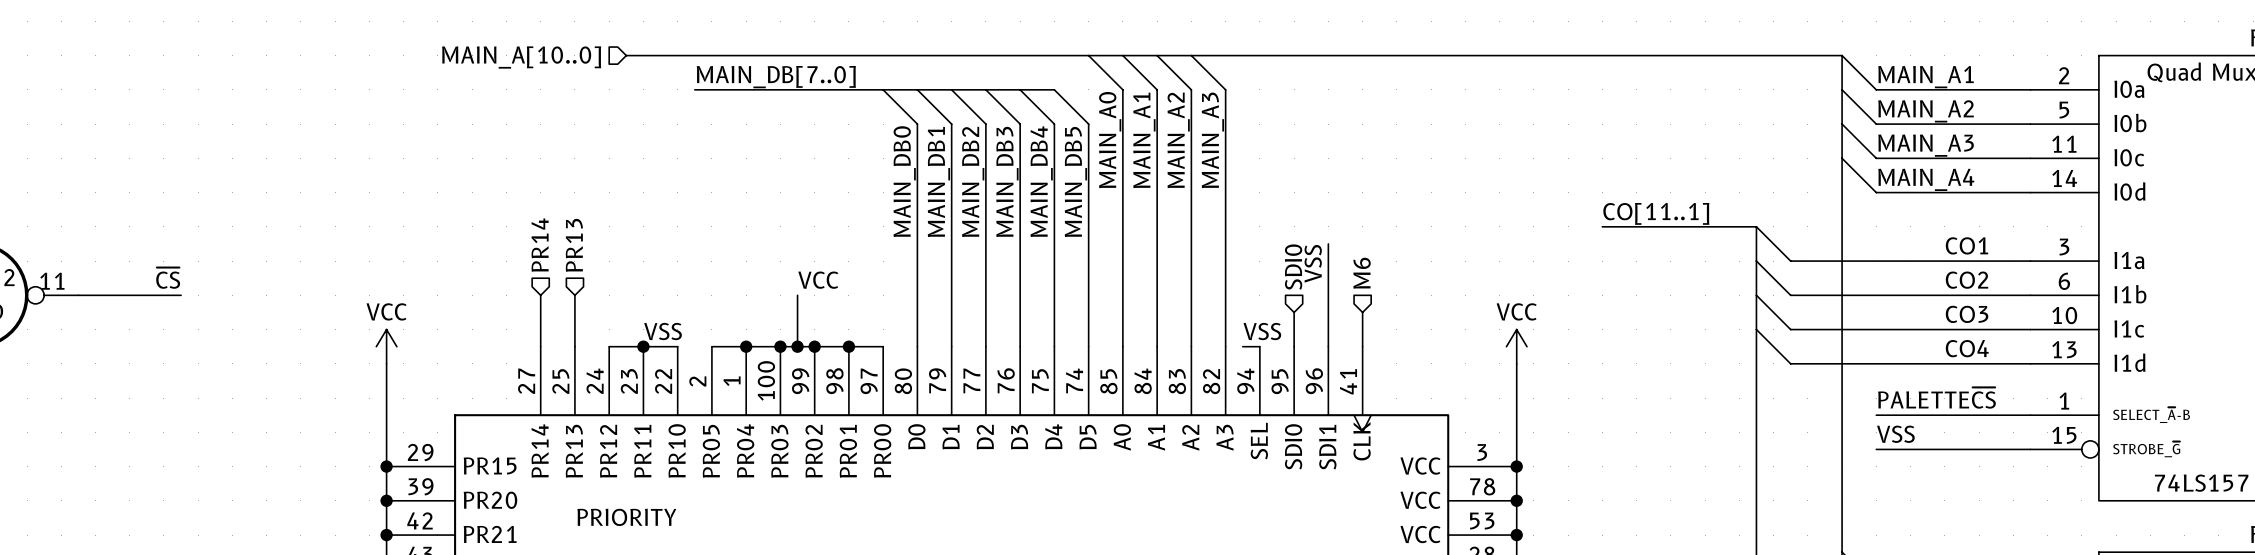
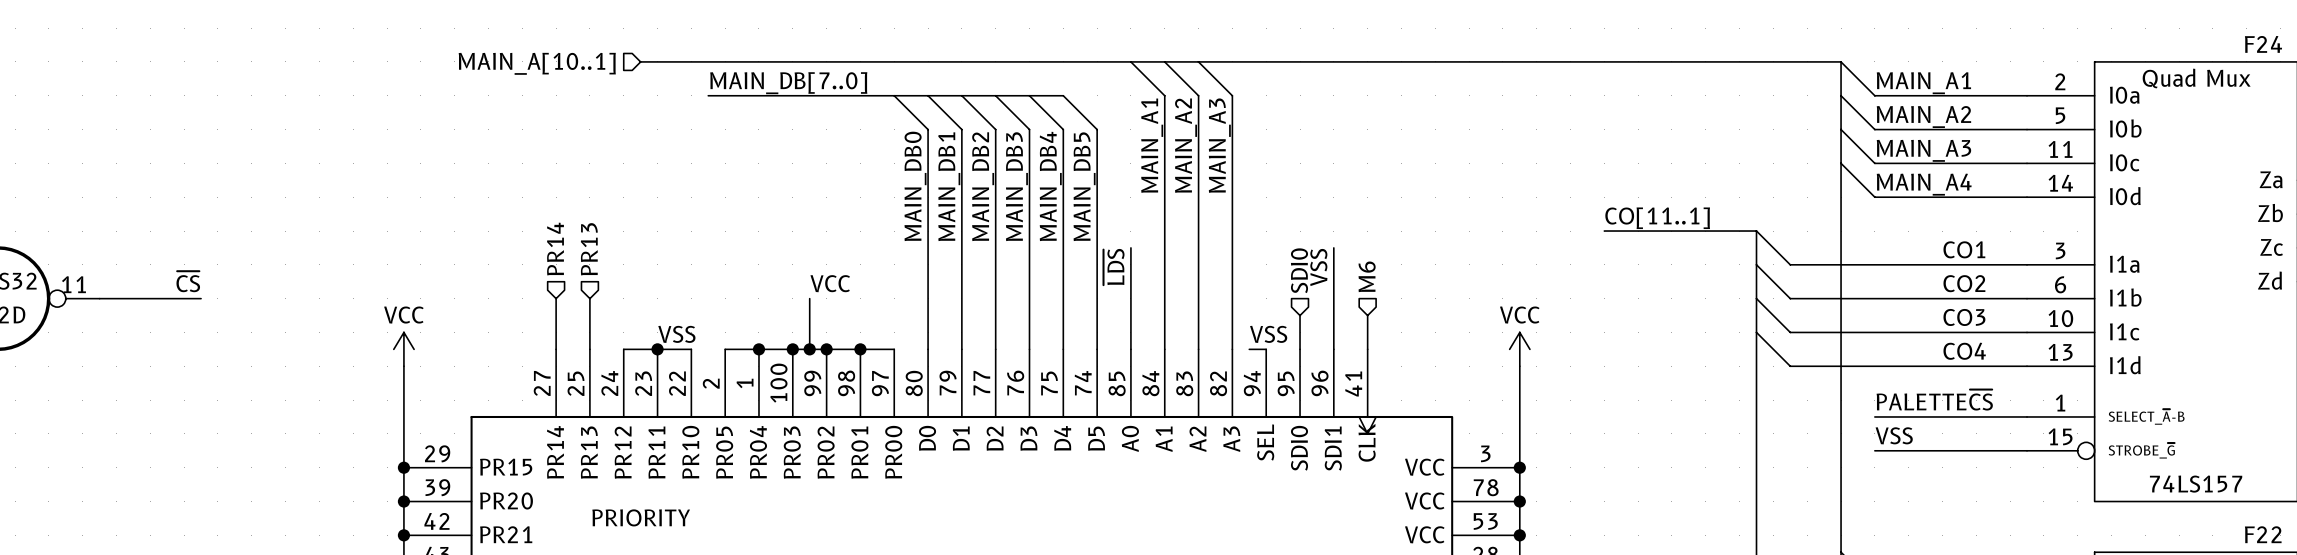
wire: (1088, 55) (1122, 89) (1122, 243) -> none
hierarchical label: MAIN_A[10..0] (521, 57) -> MAIN_A[10..1] (537, 63)
label: MAIN_A0 (1110, 140) -> none
label: none -> ~{LDS} (1114, 267)

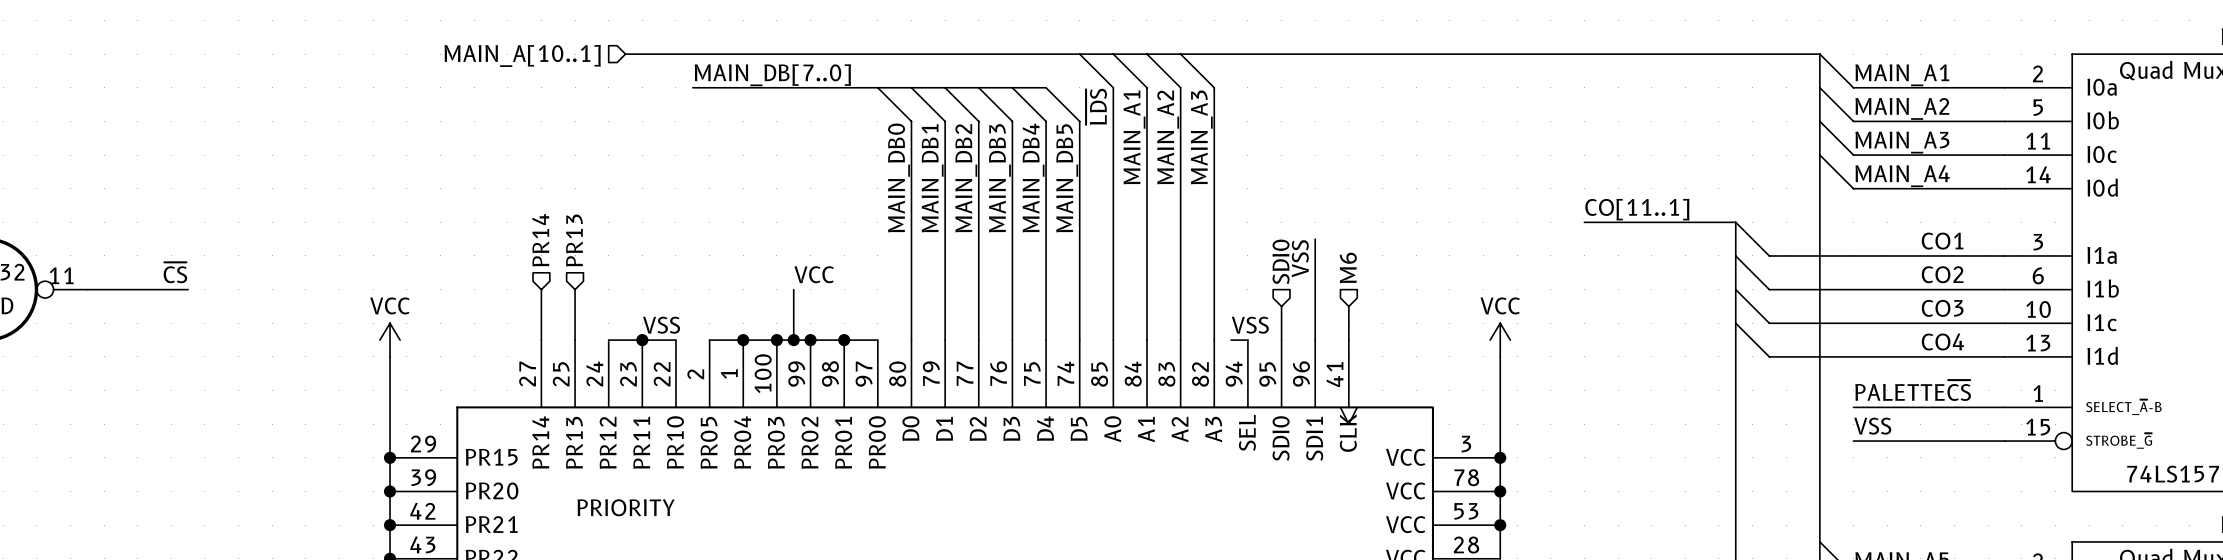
wire: none -> (1079, 54) (1113, 87) (1113, 239)
label position: ~{LDS} (1114, 267) -> ~{LDS} (1096, 106)

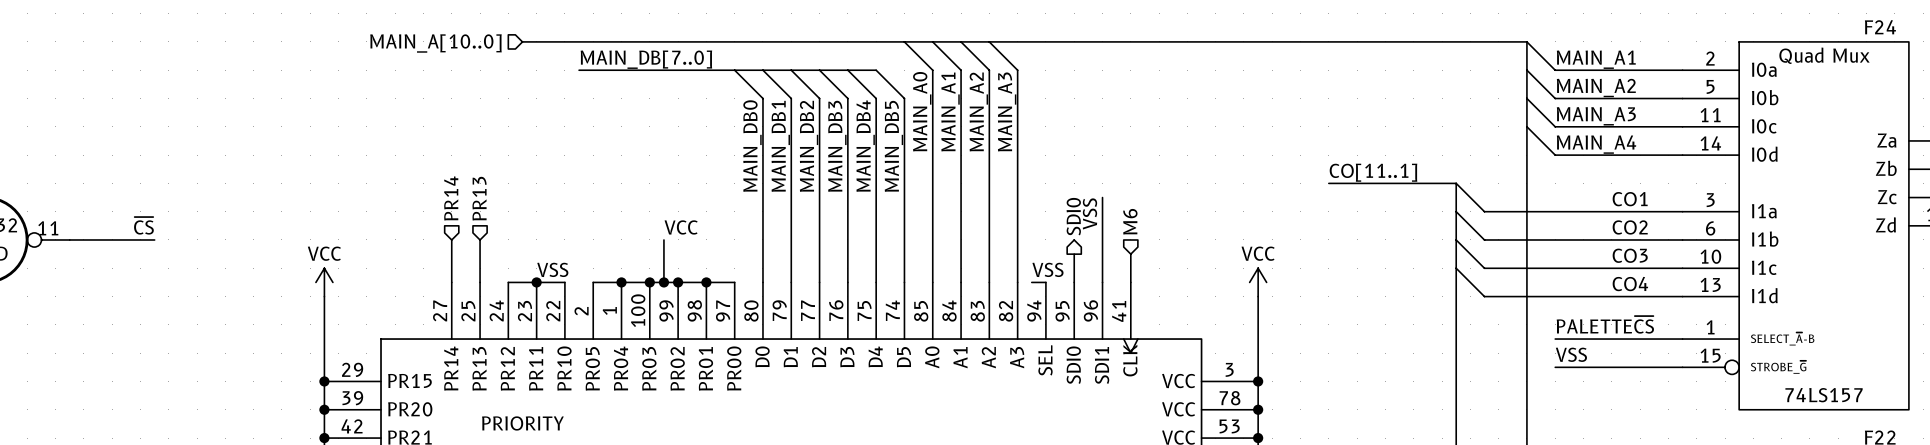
hierarchical label: MAIN_A[10..1] (522, 56) -> MAIN_A[10..0] (435, 43)
label: ~{LDS} (1096, 106) -> MAIN_A0 (922, 111)
hierarchical label shape: input (1281, 261) -> output (1073, 216)

